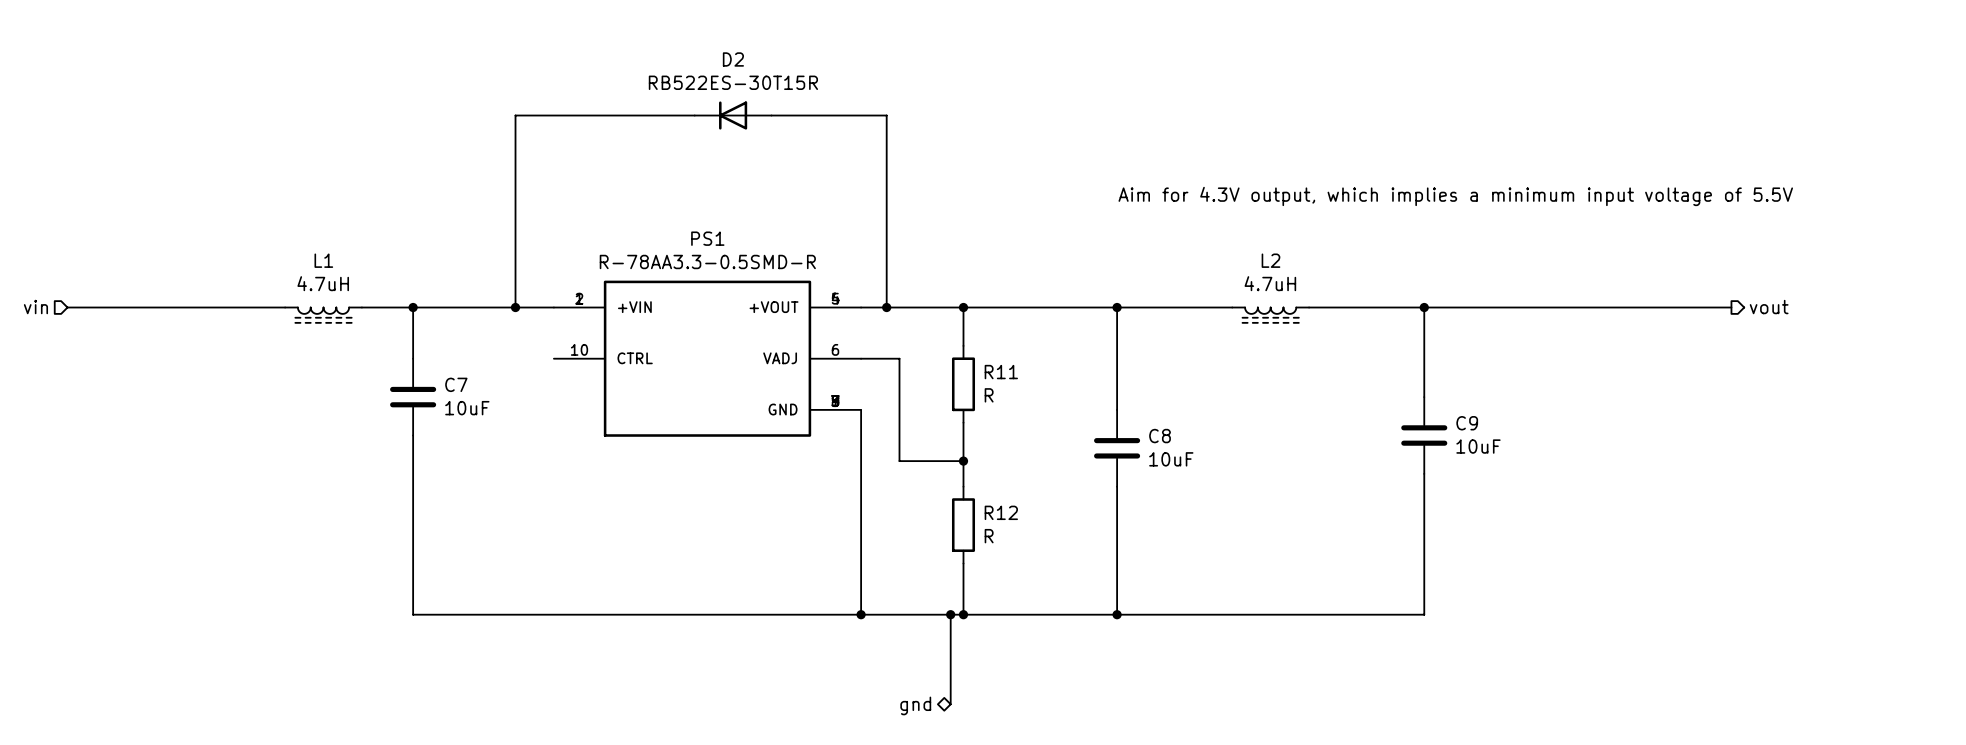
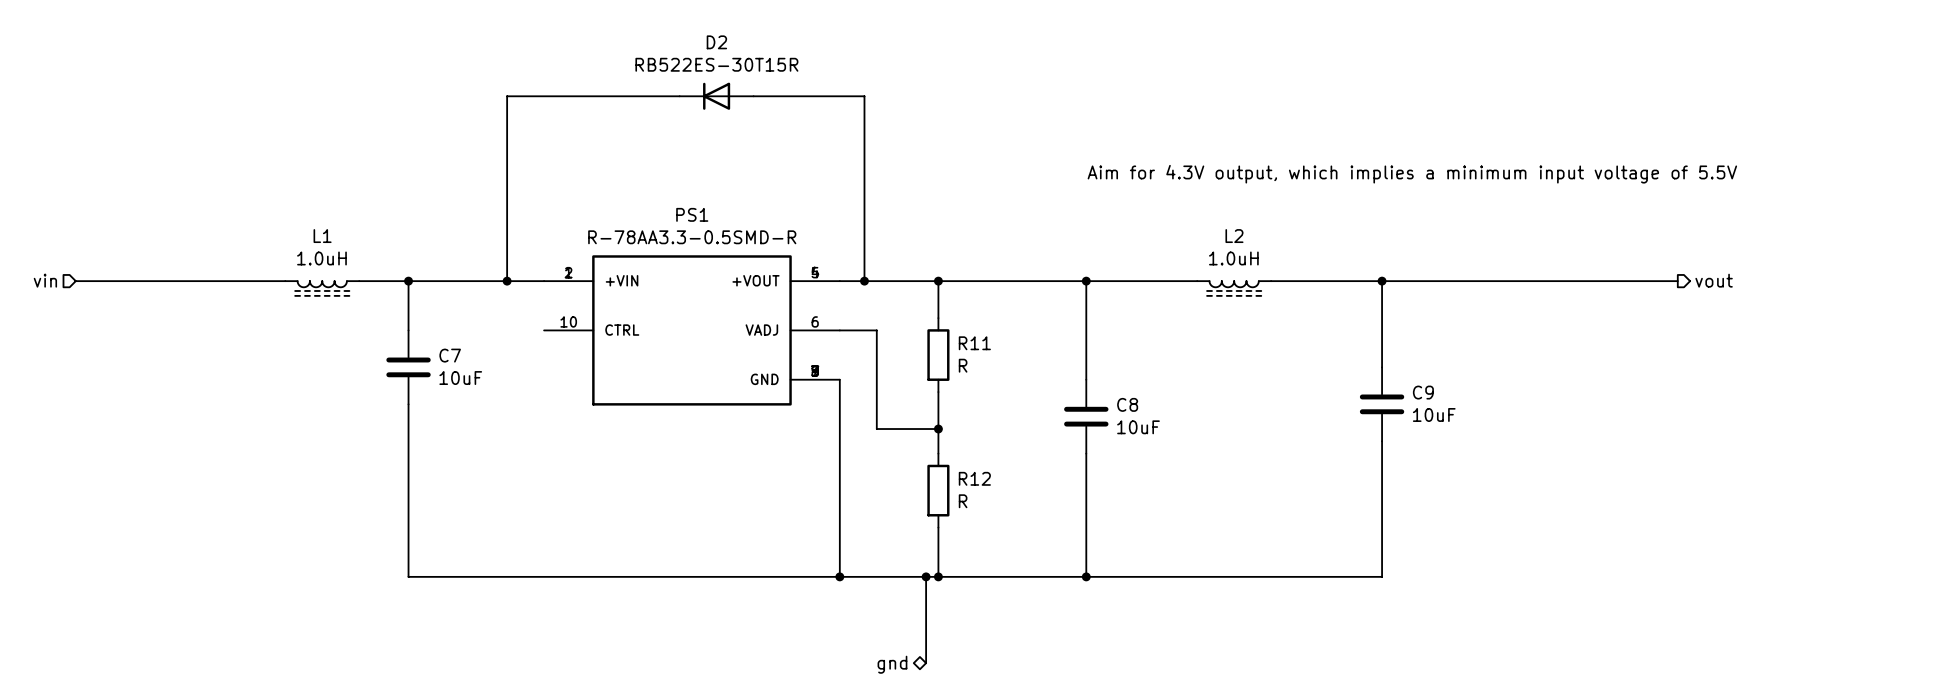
L1 value: 4.7uH (323, 283) -> 1.0uH (321, 258)
L2 value: 4.7uH (1270, 283) -> 1.0uH (1233, 258)

